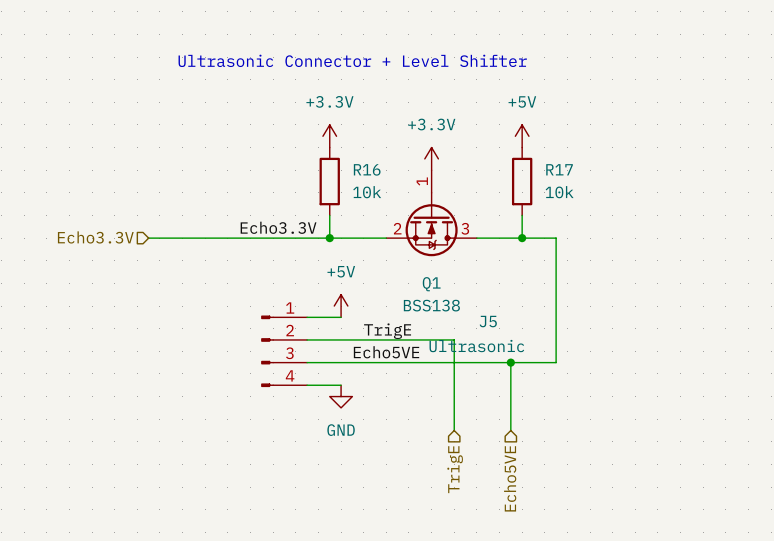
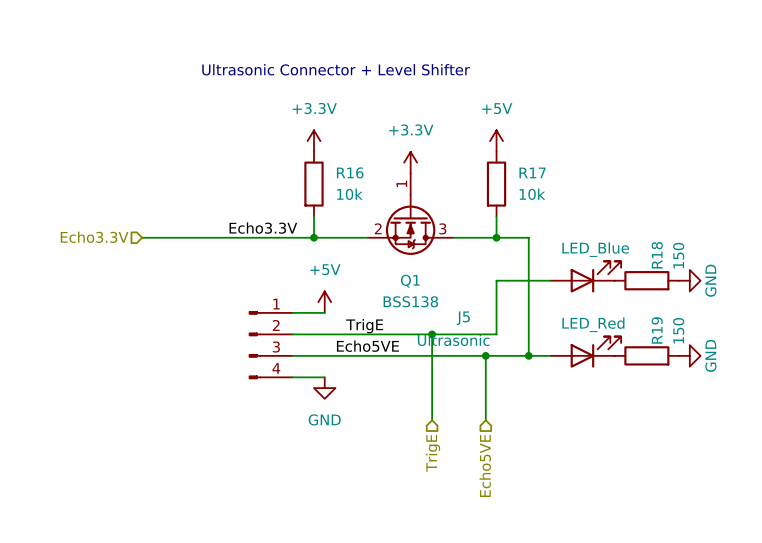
part: none -> LED_Blue (585, 276)
wire: none -> (550, 280) (496, 280) (496, 334) (432, 334)
R18: none -> 150 (646, 280)
power symbol: none -> GND (689, 280)
junction: none -> (432, 334)
part: none -> LED_Red (585, 352)
wire: none -> (528, 355) (550, 355)
junction: none -> (528, 355)
R19: none -> 150 (646, 355)
power symbol: none -> GND (689, 355)

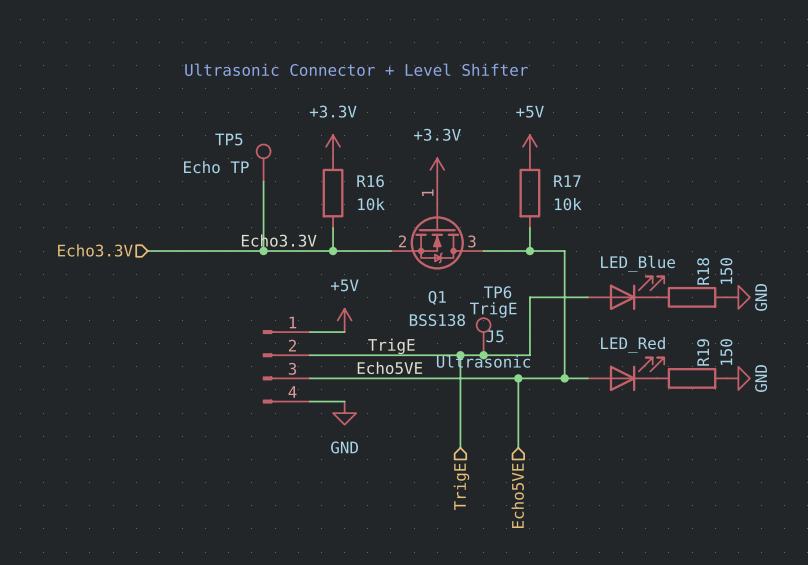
TP5: none -> Echo TP (263, 163)
wire: none -> (263, 181) (263, 251)
junction: none -> (263, 251)
TP6: none -> TrigE (483, 336)
junction: none -> (483, 355)

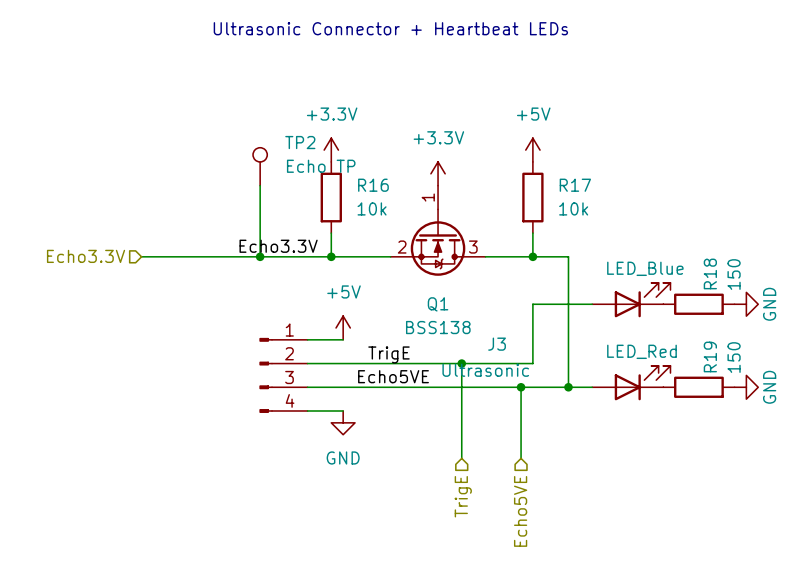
text: none -> Ultrasonic Connector + Heartbeat LEDs (390, 28)
text: Ultrasonic Connector + Level Shifter (356, 69) -> none
TP5 name: TP5 (228, 139) -> TP2 (300, 142)
TP5 value position: Echo TP (216, 167) -> Echo TP (321, 166)
TP6: TrigE (483, 336) -> none
J5 name: J5 (494, 336) -> J3 (497, 344)
junction: (483, 355) -> none

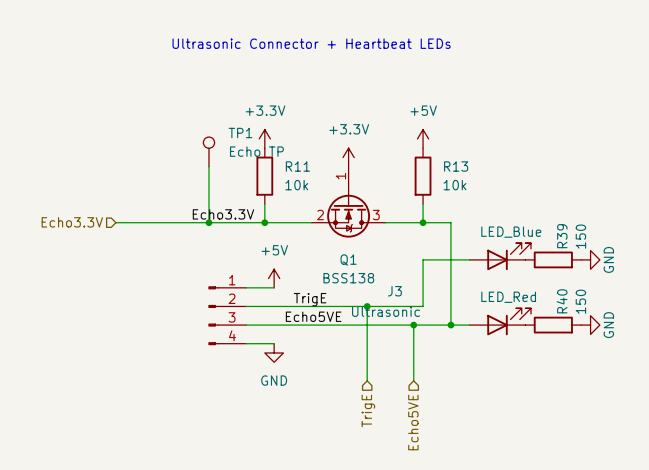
TP2 name: TP2 (300, 142) -> TP1 (240, 133)
R16 name: R16 (373, 185) -> R11 (297, 166)
R17 name: R17 (575, 185) -> R13 (456, 166)
R18 name: R18 (710, 273) -> R39 (562, 236)
R19 name: R19 (710, 356) -> R40 (562, 301)

